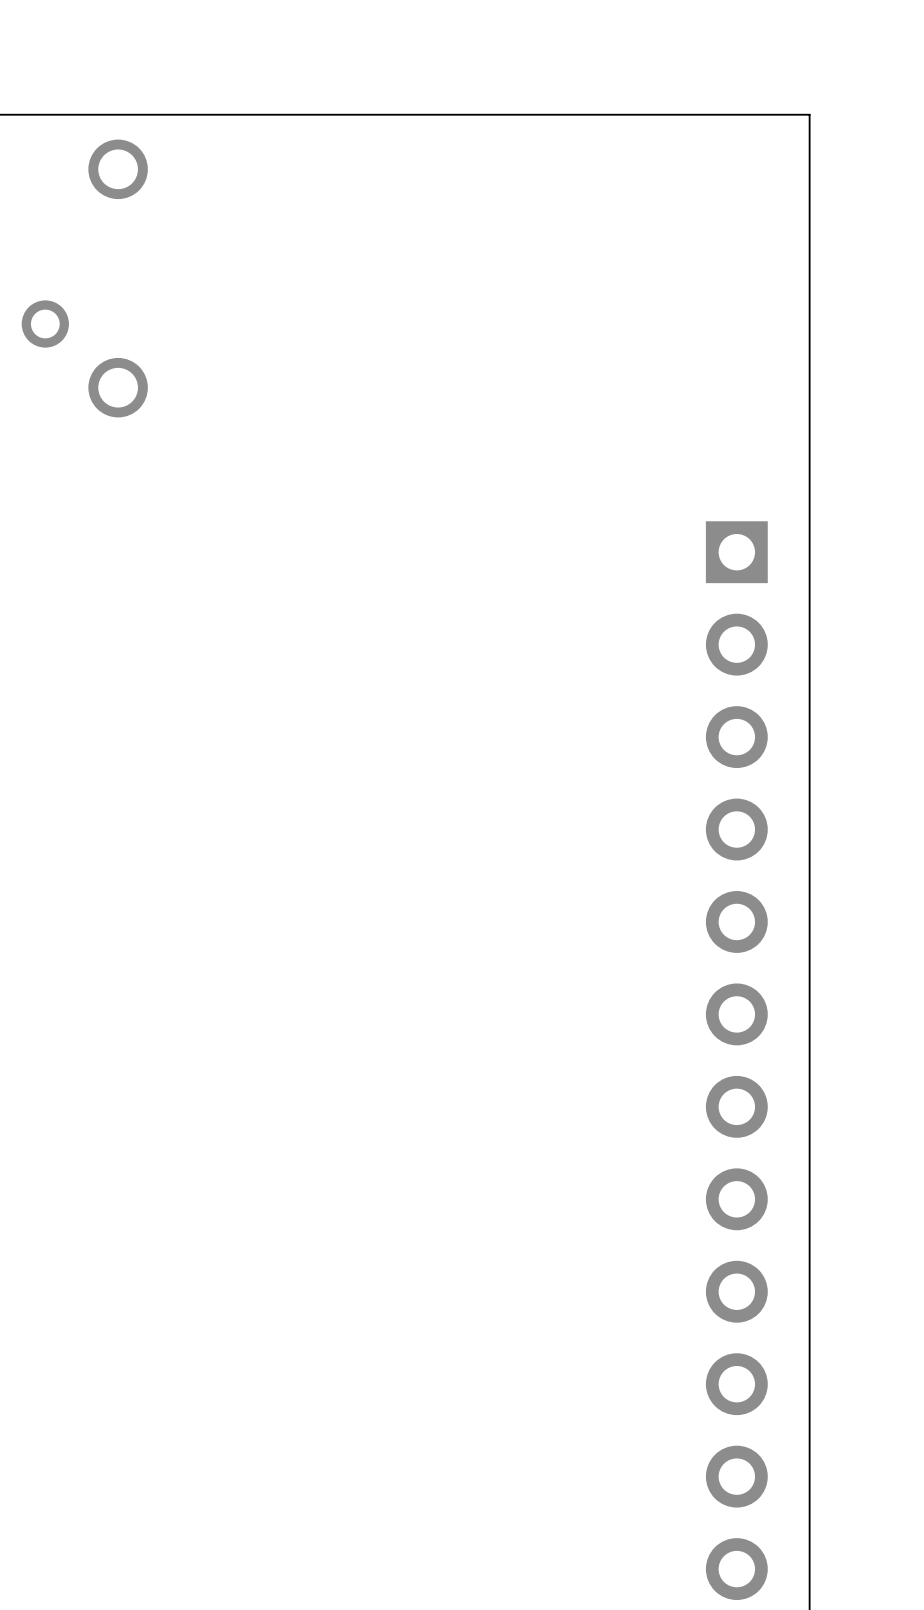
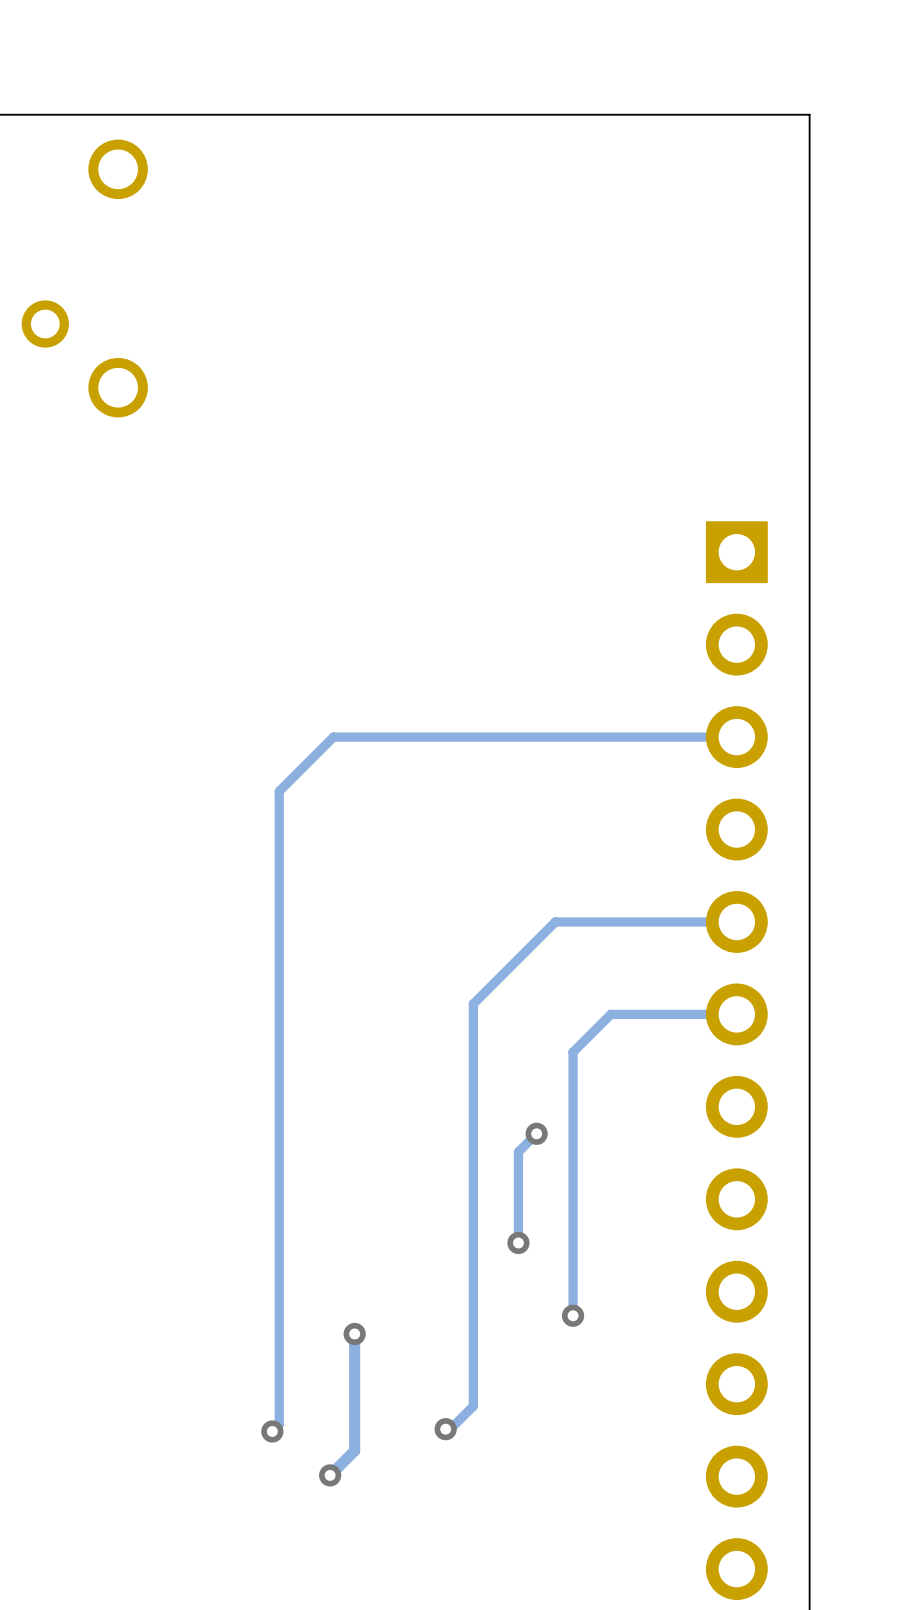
track: none -> (736, 737) (333, 737) (279, 791) (279, 1424) (272, 1431)
track: none -> (736, 921) (555, 921) (473, 1003) (473, 1406) (450, 1429) (445, 1429)
track: none -> (736, 1014) (610, 1014) (573, 1052) (573, 1315)
track: none -> (536, 1133) (518, 1151) (518, 1242)
via: none -> (536, 1133)
via: none -> (518, 1242)
via: none -> (573, 1315)
track: none -> (354, 1333) (354, 1450) (330, 1475)
via: none -> (354, 1333)
via: none -> (445, 1429)
via: none -> (272, 1431)
via: none -> (330, 1475)

